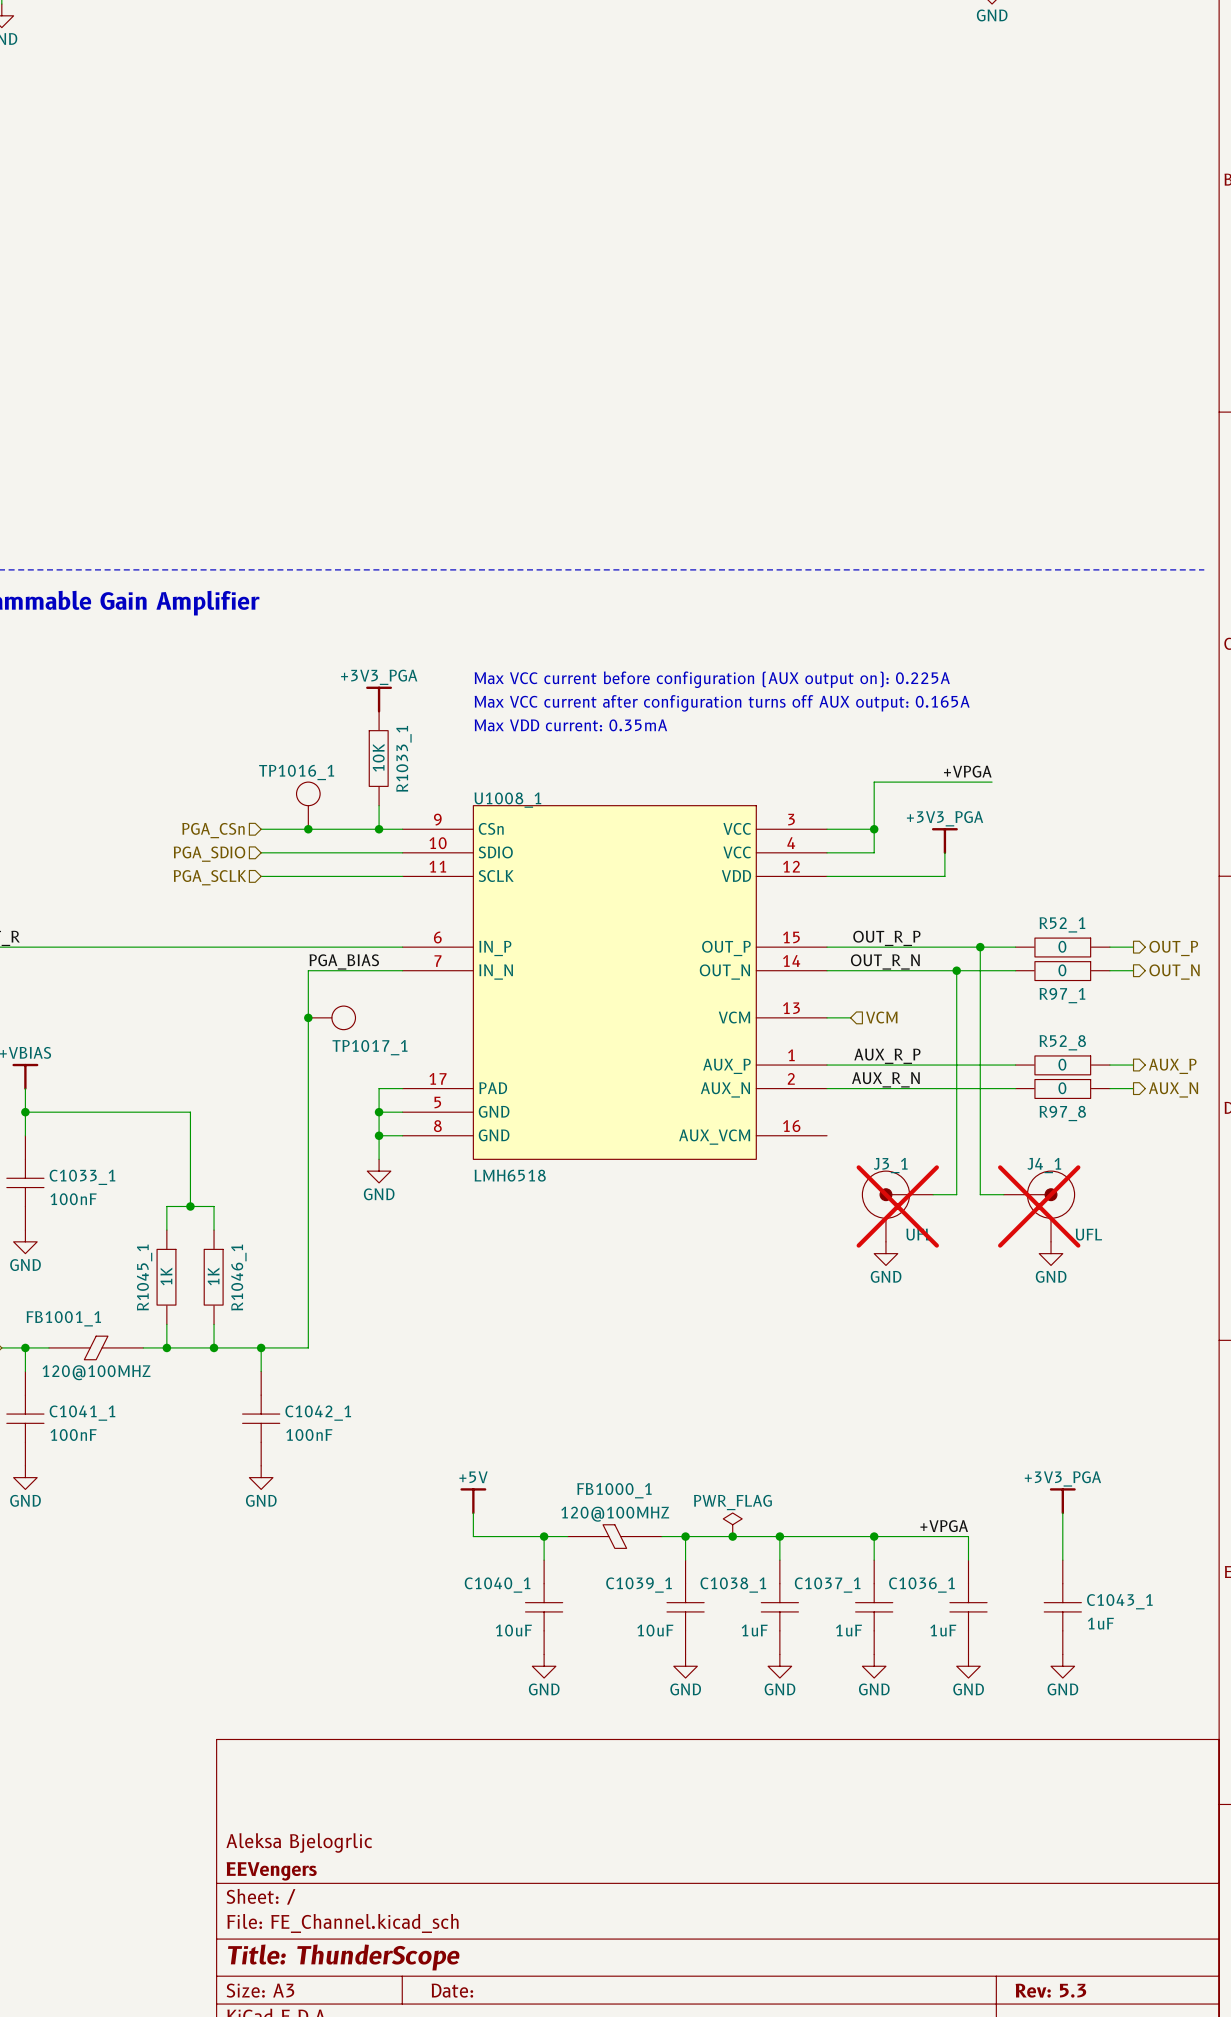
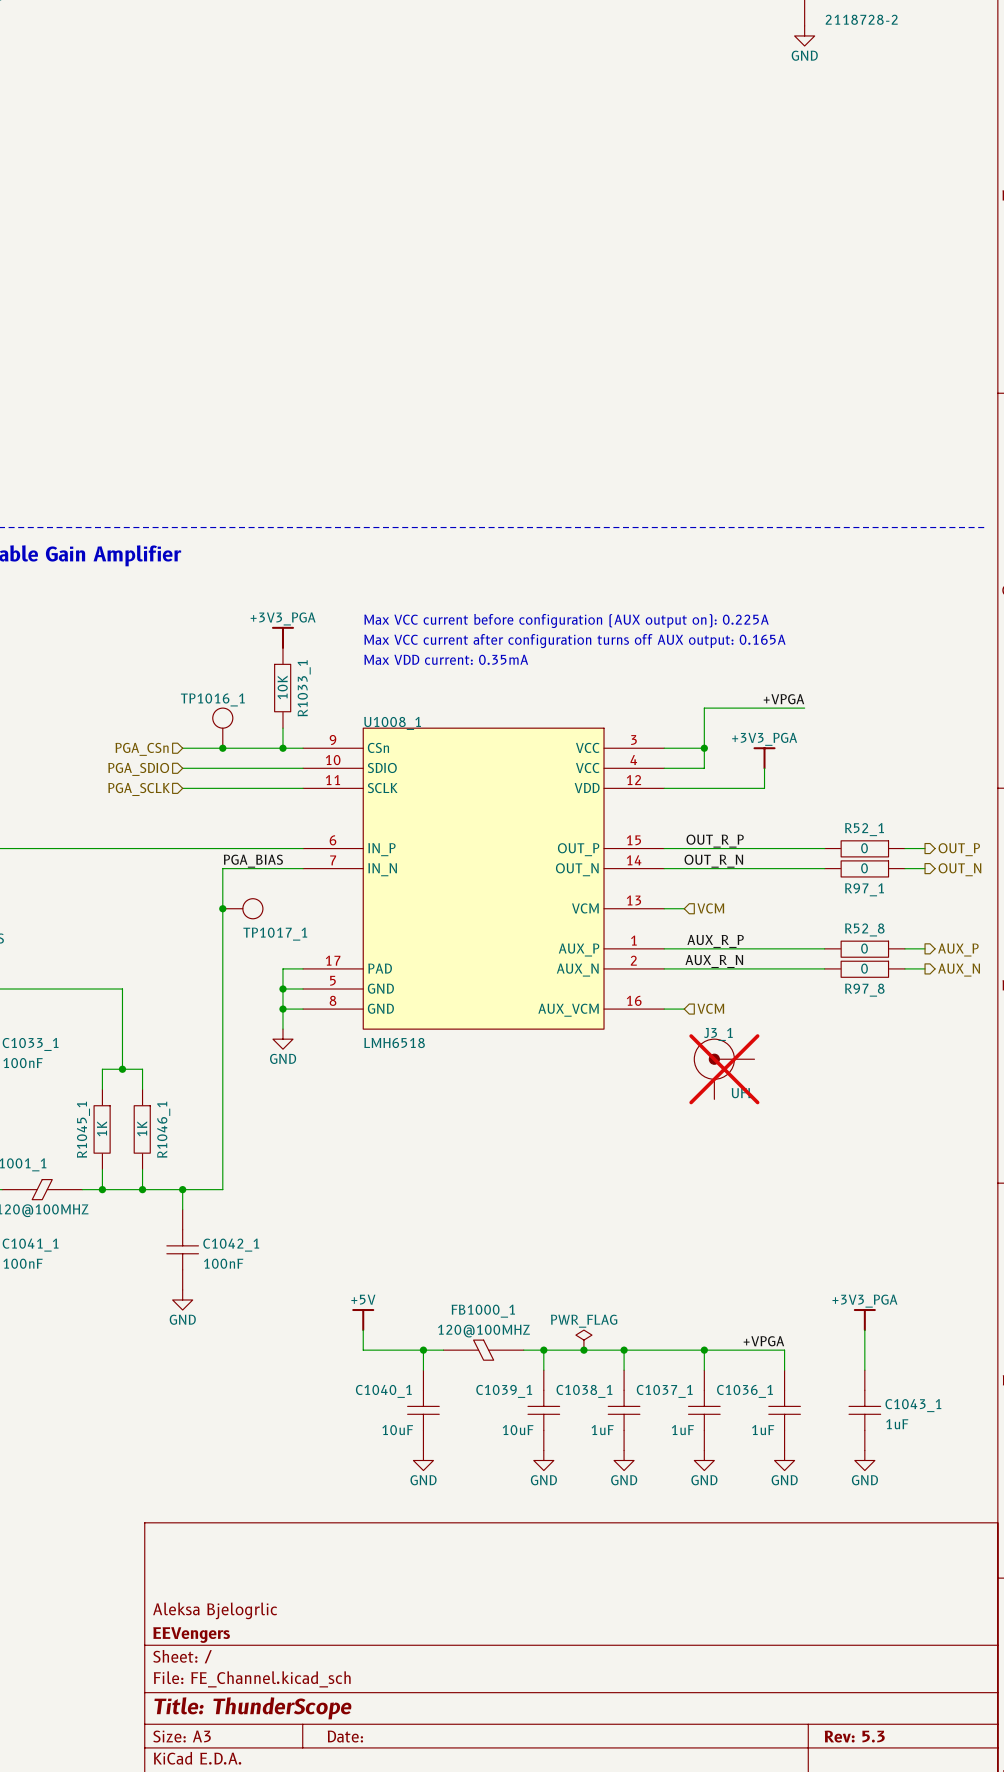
wire: (980, 947) (980, 1194) (1003, 1194) -> none
junction: (980, 947) -> none
wire: (956, 970) (956, 1194) (933, 1194) -> none
junction: (956, 970) -> none
wire: none -> (664, 1009) (684, 1009)
hierarchical label: none -> VCM (710, 1008)
J4_1: UFL (1039, 1206) -> none
power symbol: GND (885, 1253) -> none
power symbol: GND (1051, 1253) -> none

